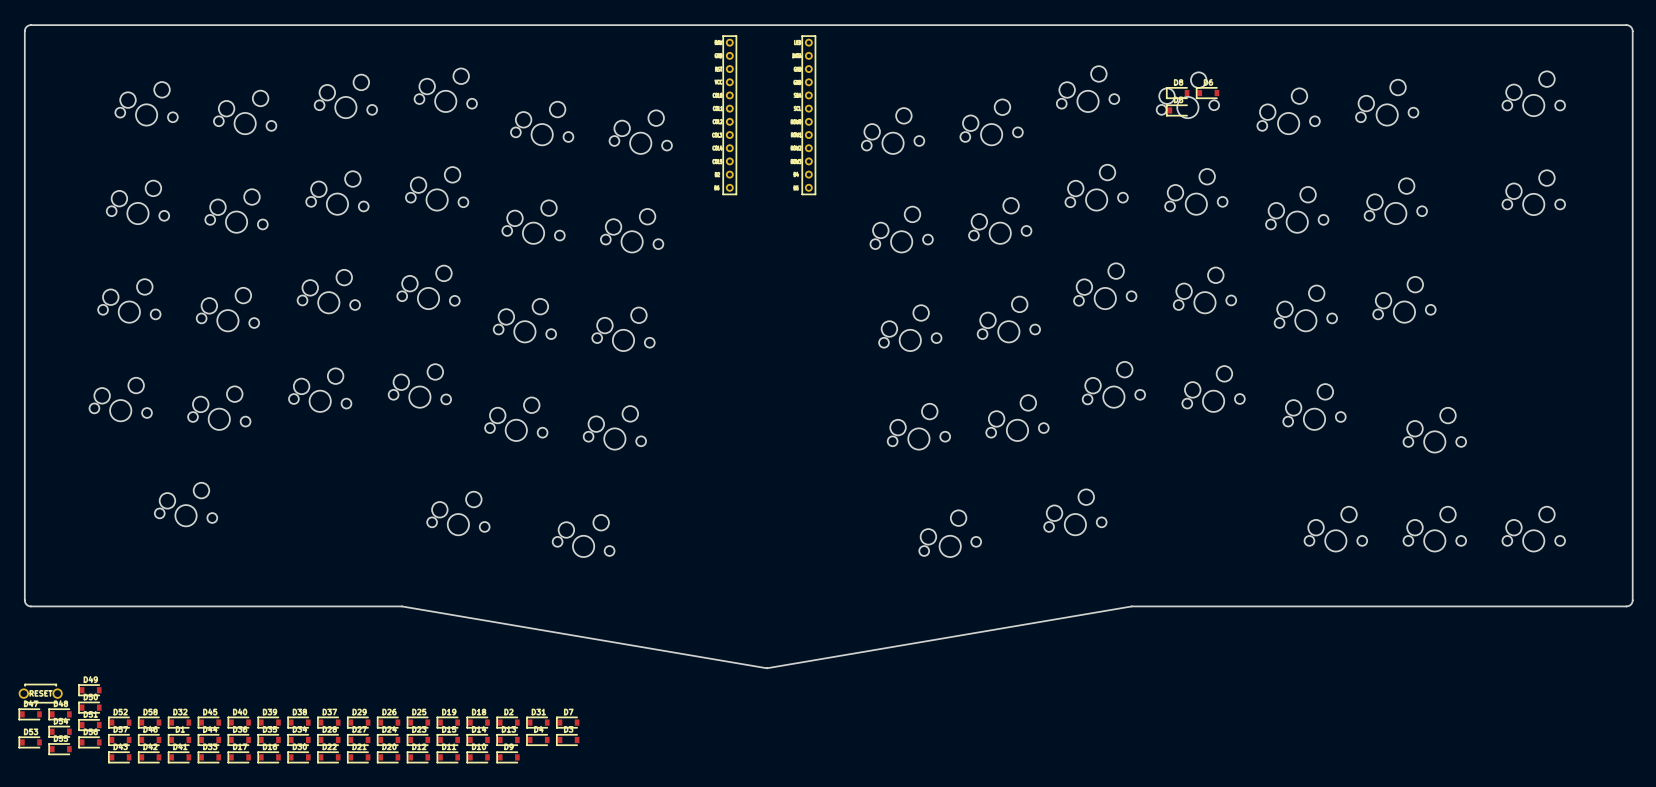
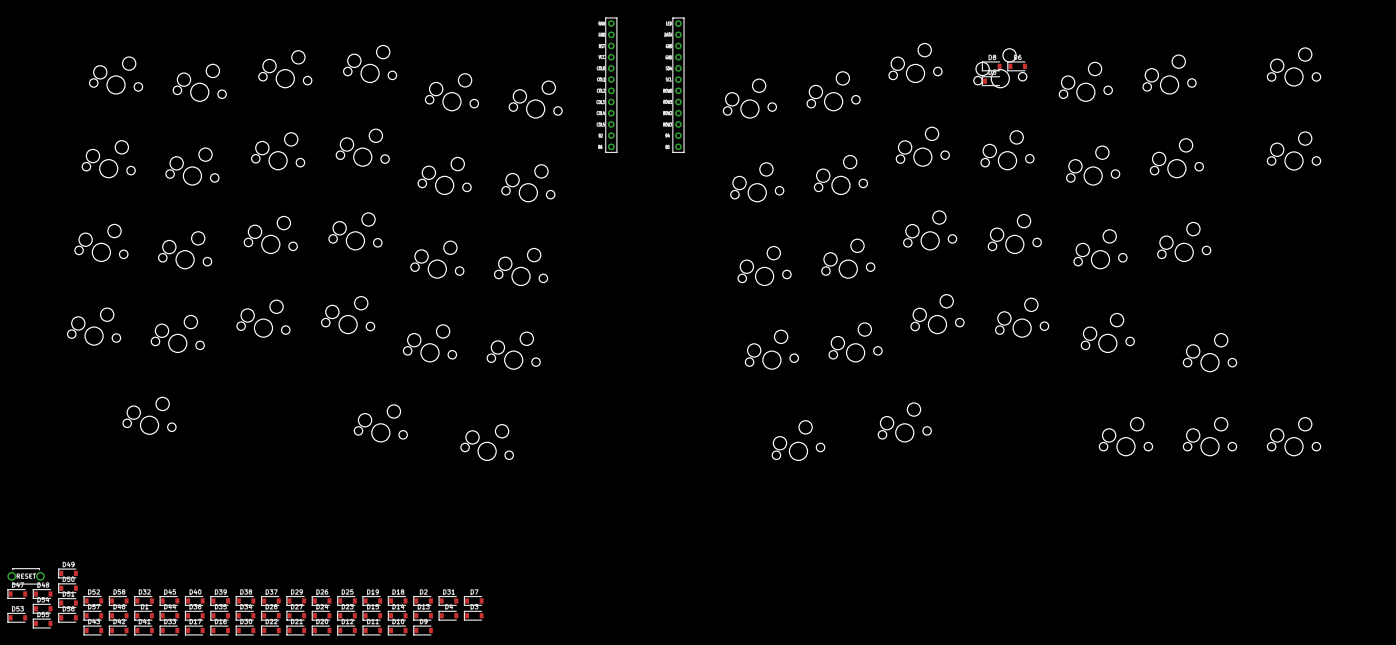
board edge: (30, 25) (1628, 25) (1632, 31) (1632, 602) (1626, 606) (1131, 606) (766, 668) (402, 606) (28, 605) (24, 600) (24, 31) (26, 26) (30, 25) -> none

